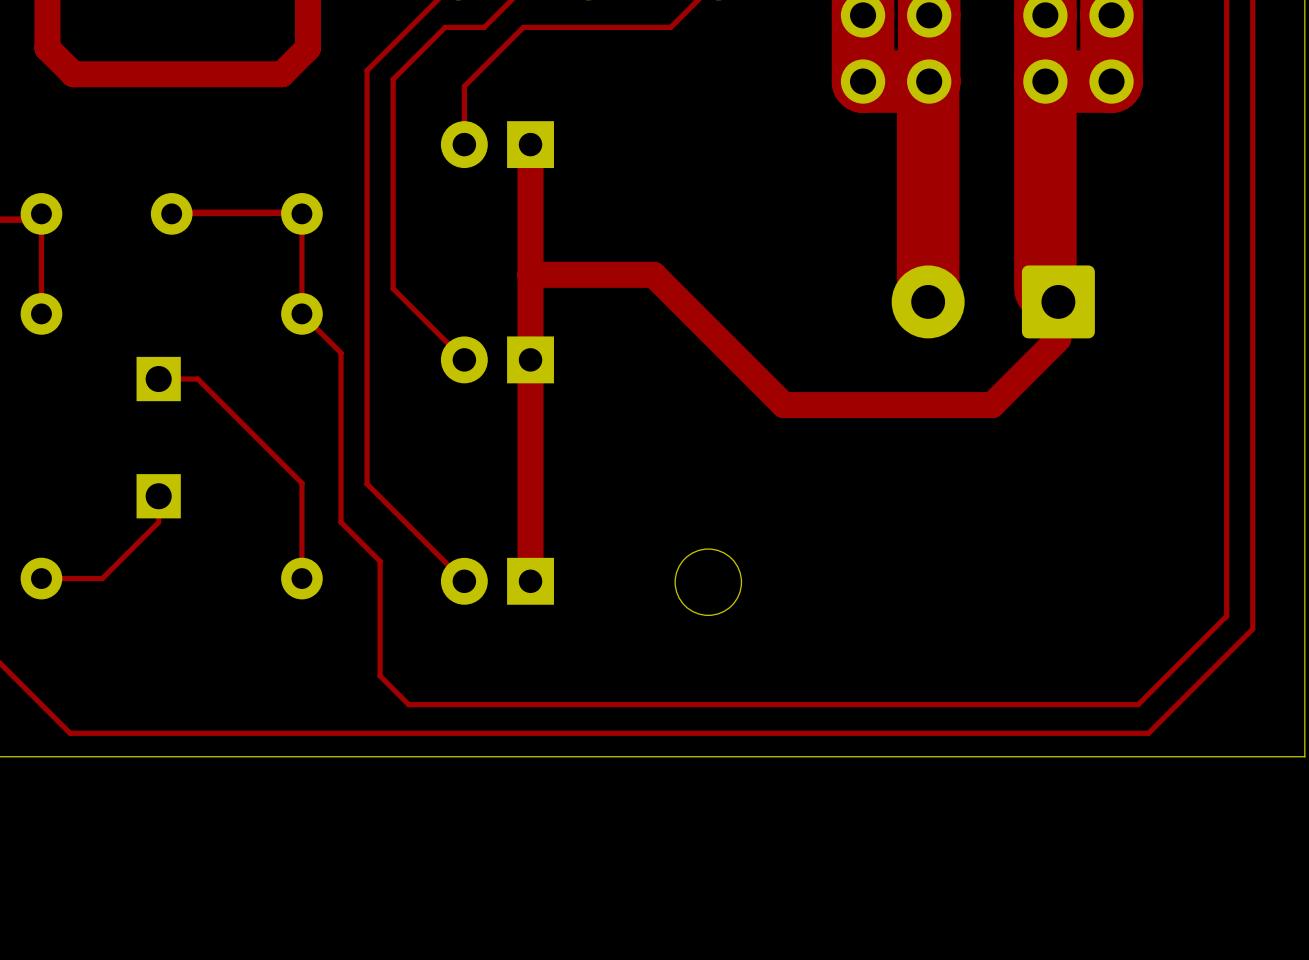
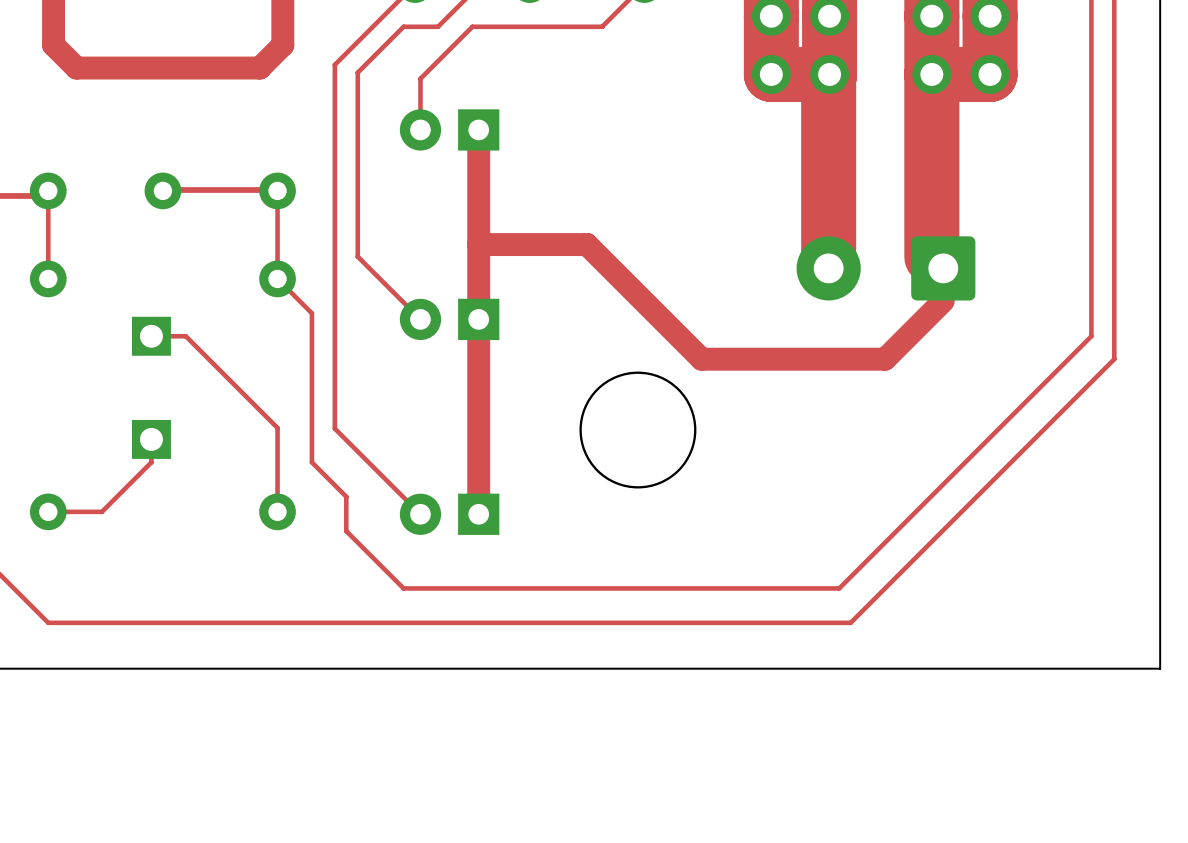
top track: (1226, 379) (1226, 616) (1138, 704) (953, 704) -> (1114, 359) (850, 622)
top track: none -> (1091, 336) (839, 588) (403, 588) (346, 531)
top track: (1252, 405) (1252, 629) (1148, 733) (70, 733) (41, 704) -> none
round board edge: none -> [579, 371, 697, 489]
round board edge: [674, 548, 743, 617] -> none
top track: (380, 600) (380, 675) (408, 704) -> (48, 622) (371, 622)

